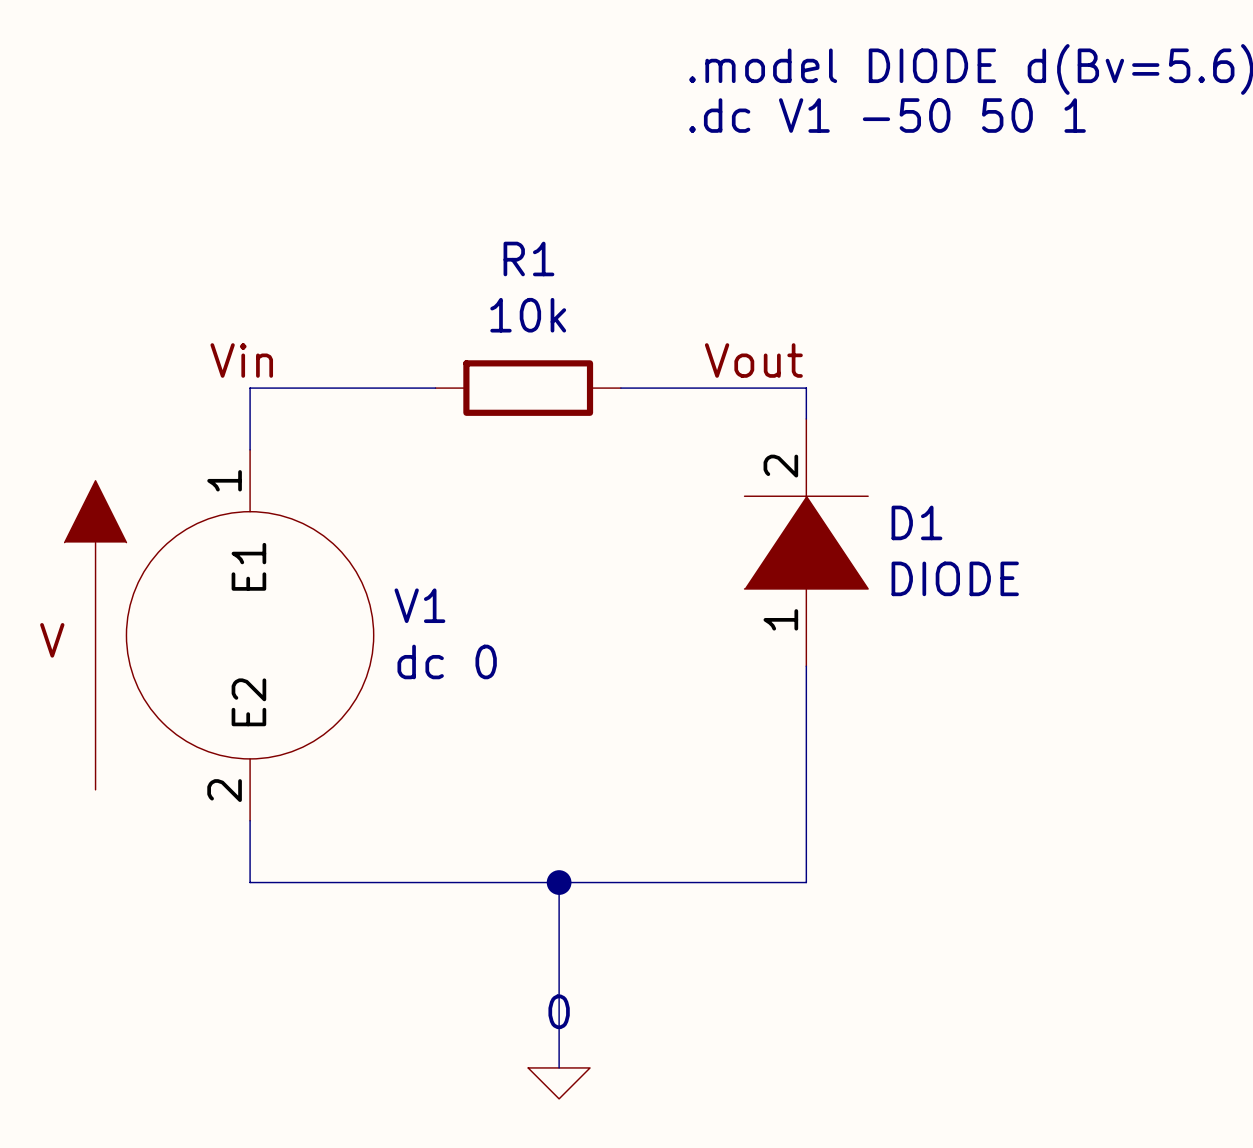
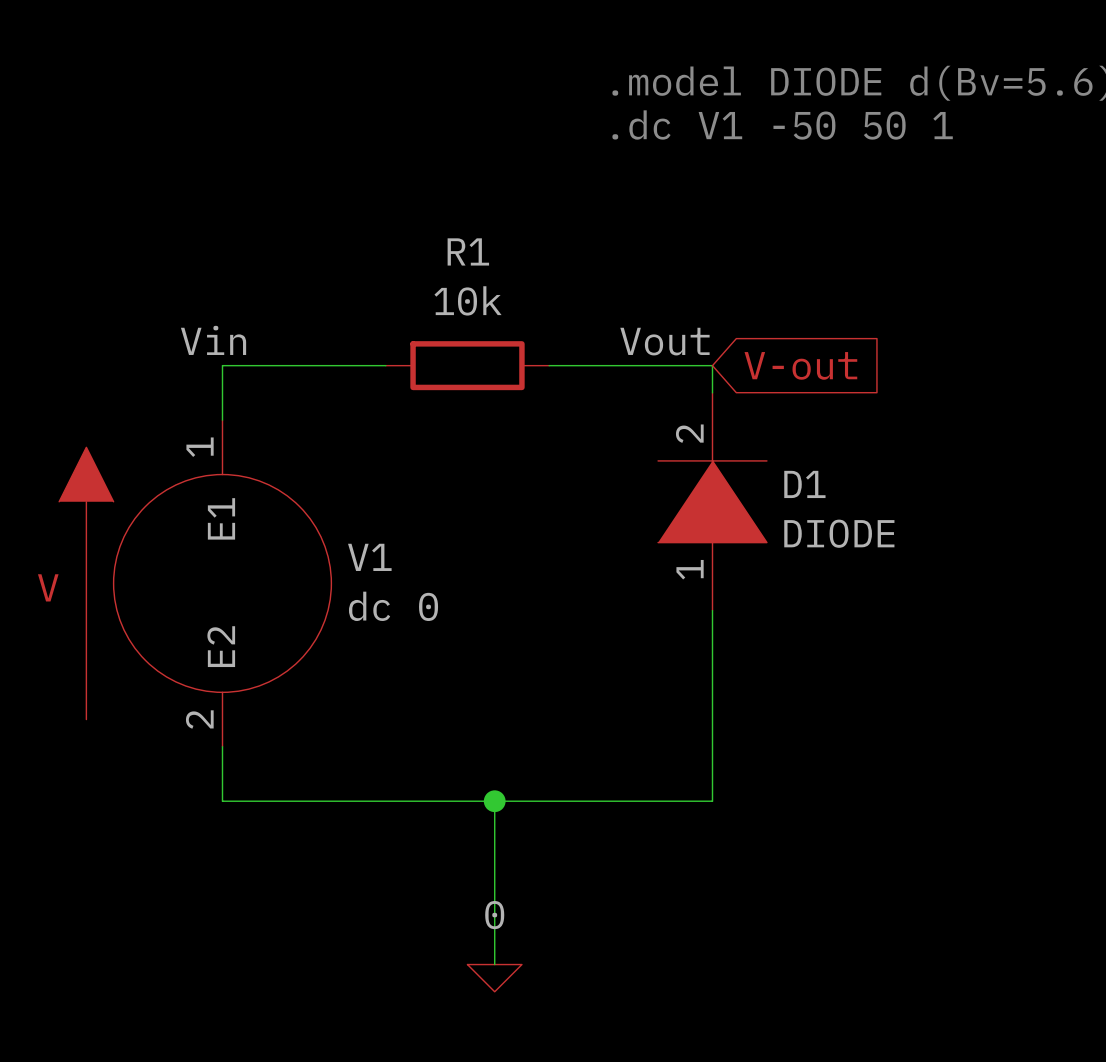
global label: none -> V-out (800, 365)

